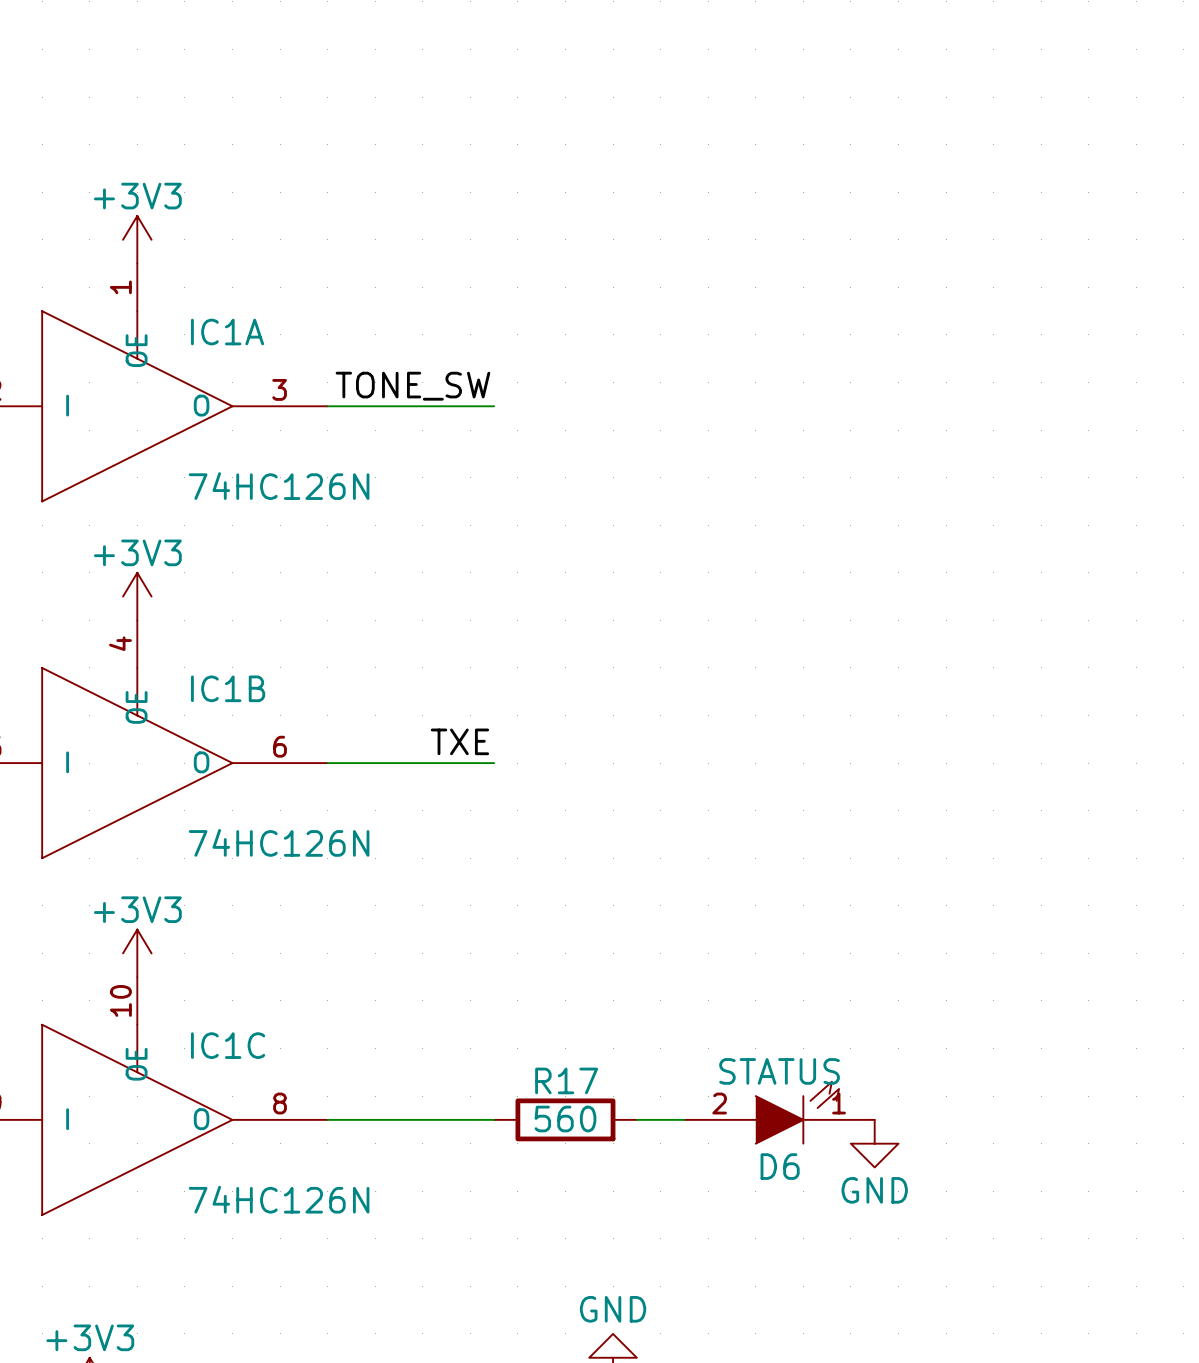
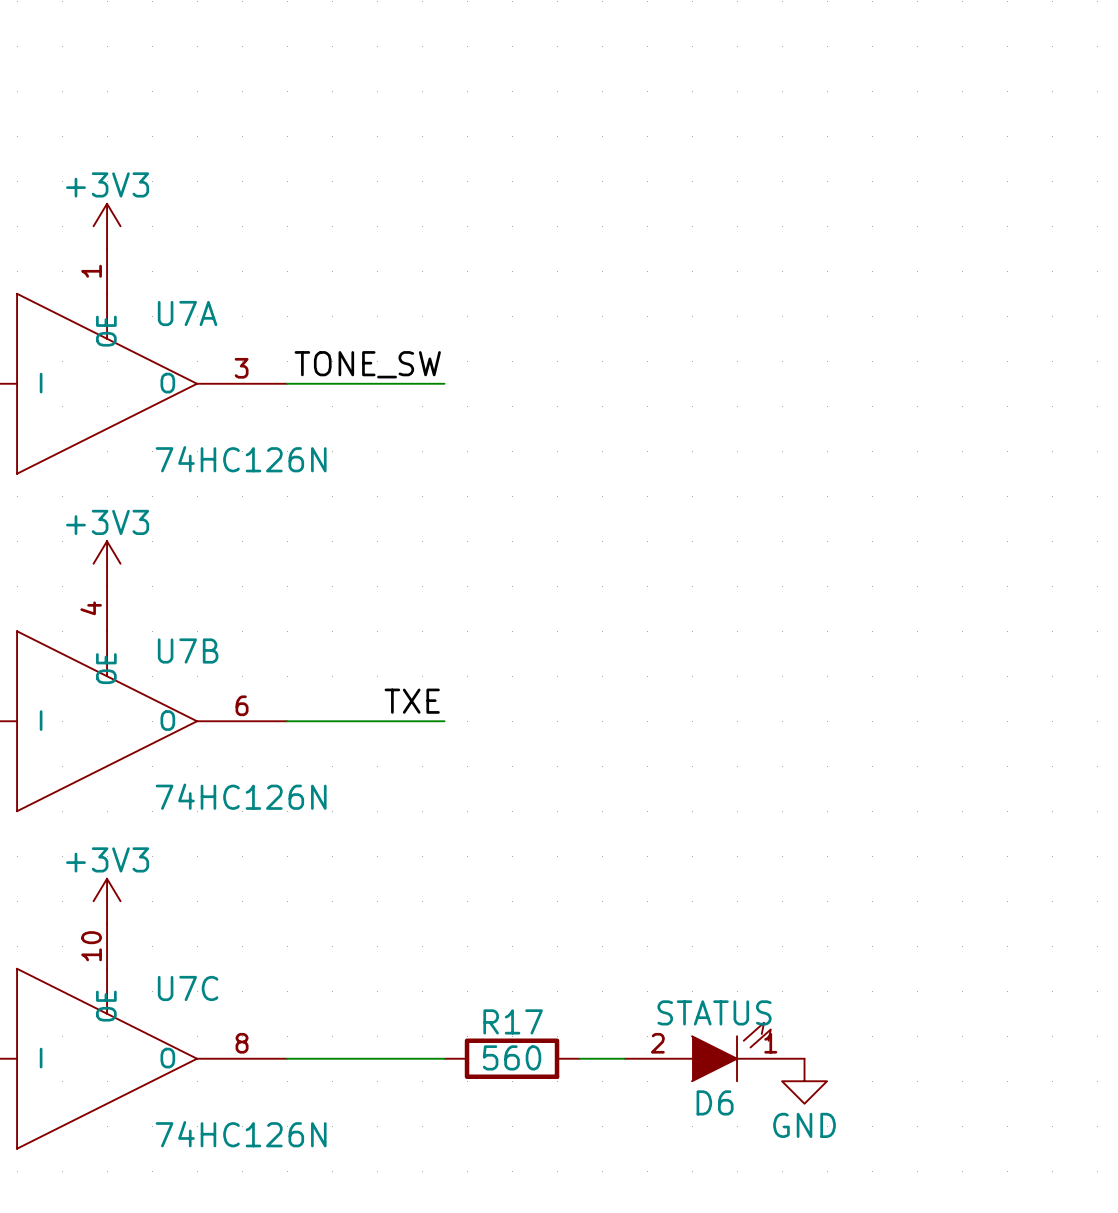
IC1A name: IC1A (227, 332) -> U7A (187, 313)
IC1B name: IC1B (228, 688) -> U7B (188, 651)
IC1C name: IC1C (228, 1045) -> U7C (188, 988)

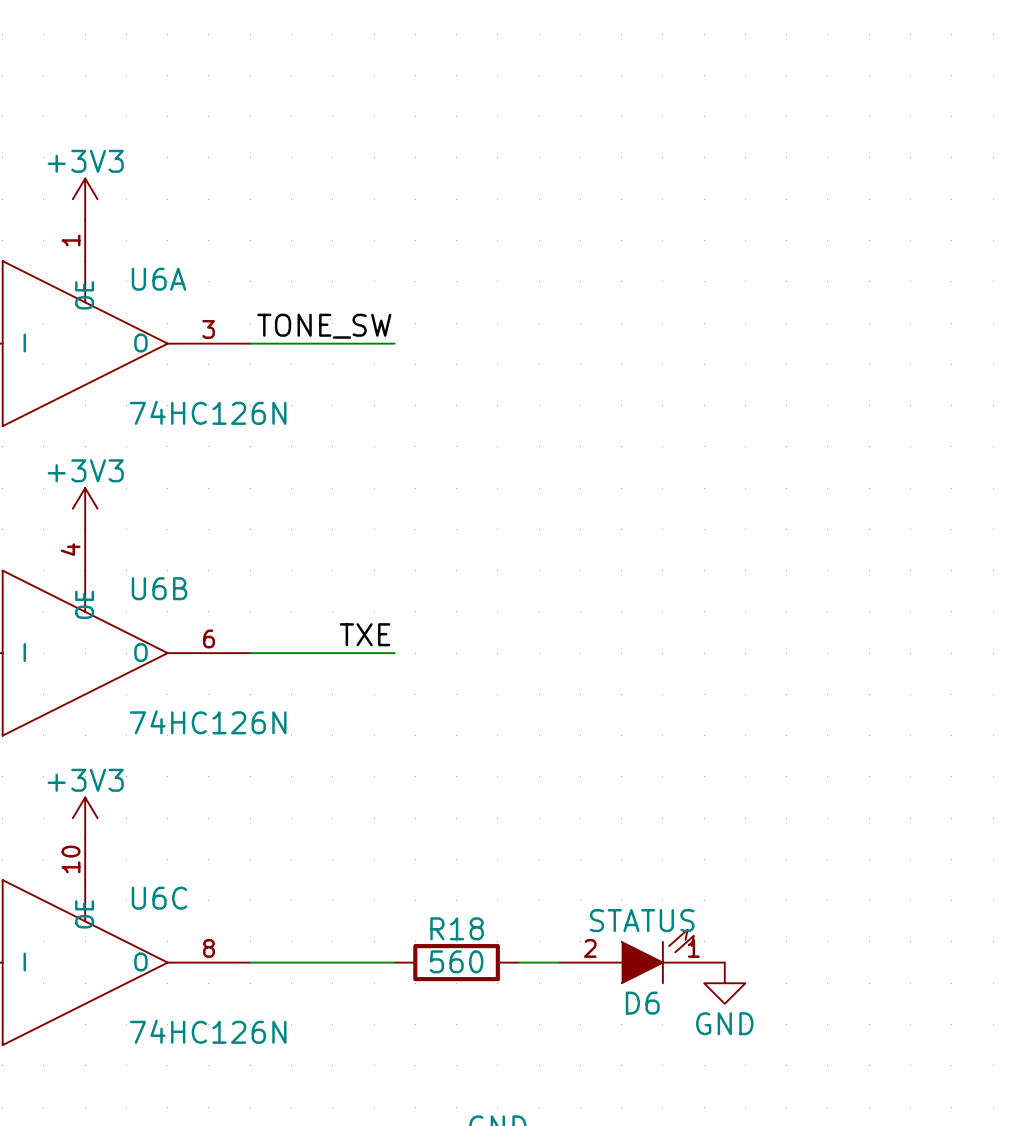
U7A name: U7A (187, 313) -> U6A (159, 279)
U7B name: U7B (188, 651) -> U6B (159, 588)
U7C name: U7C (188, 988) -> U6C (159, 898)
R17 name: R17 (513, 1021) -> R18 (457, 928)

